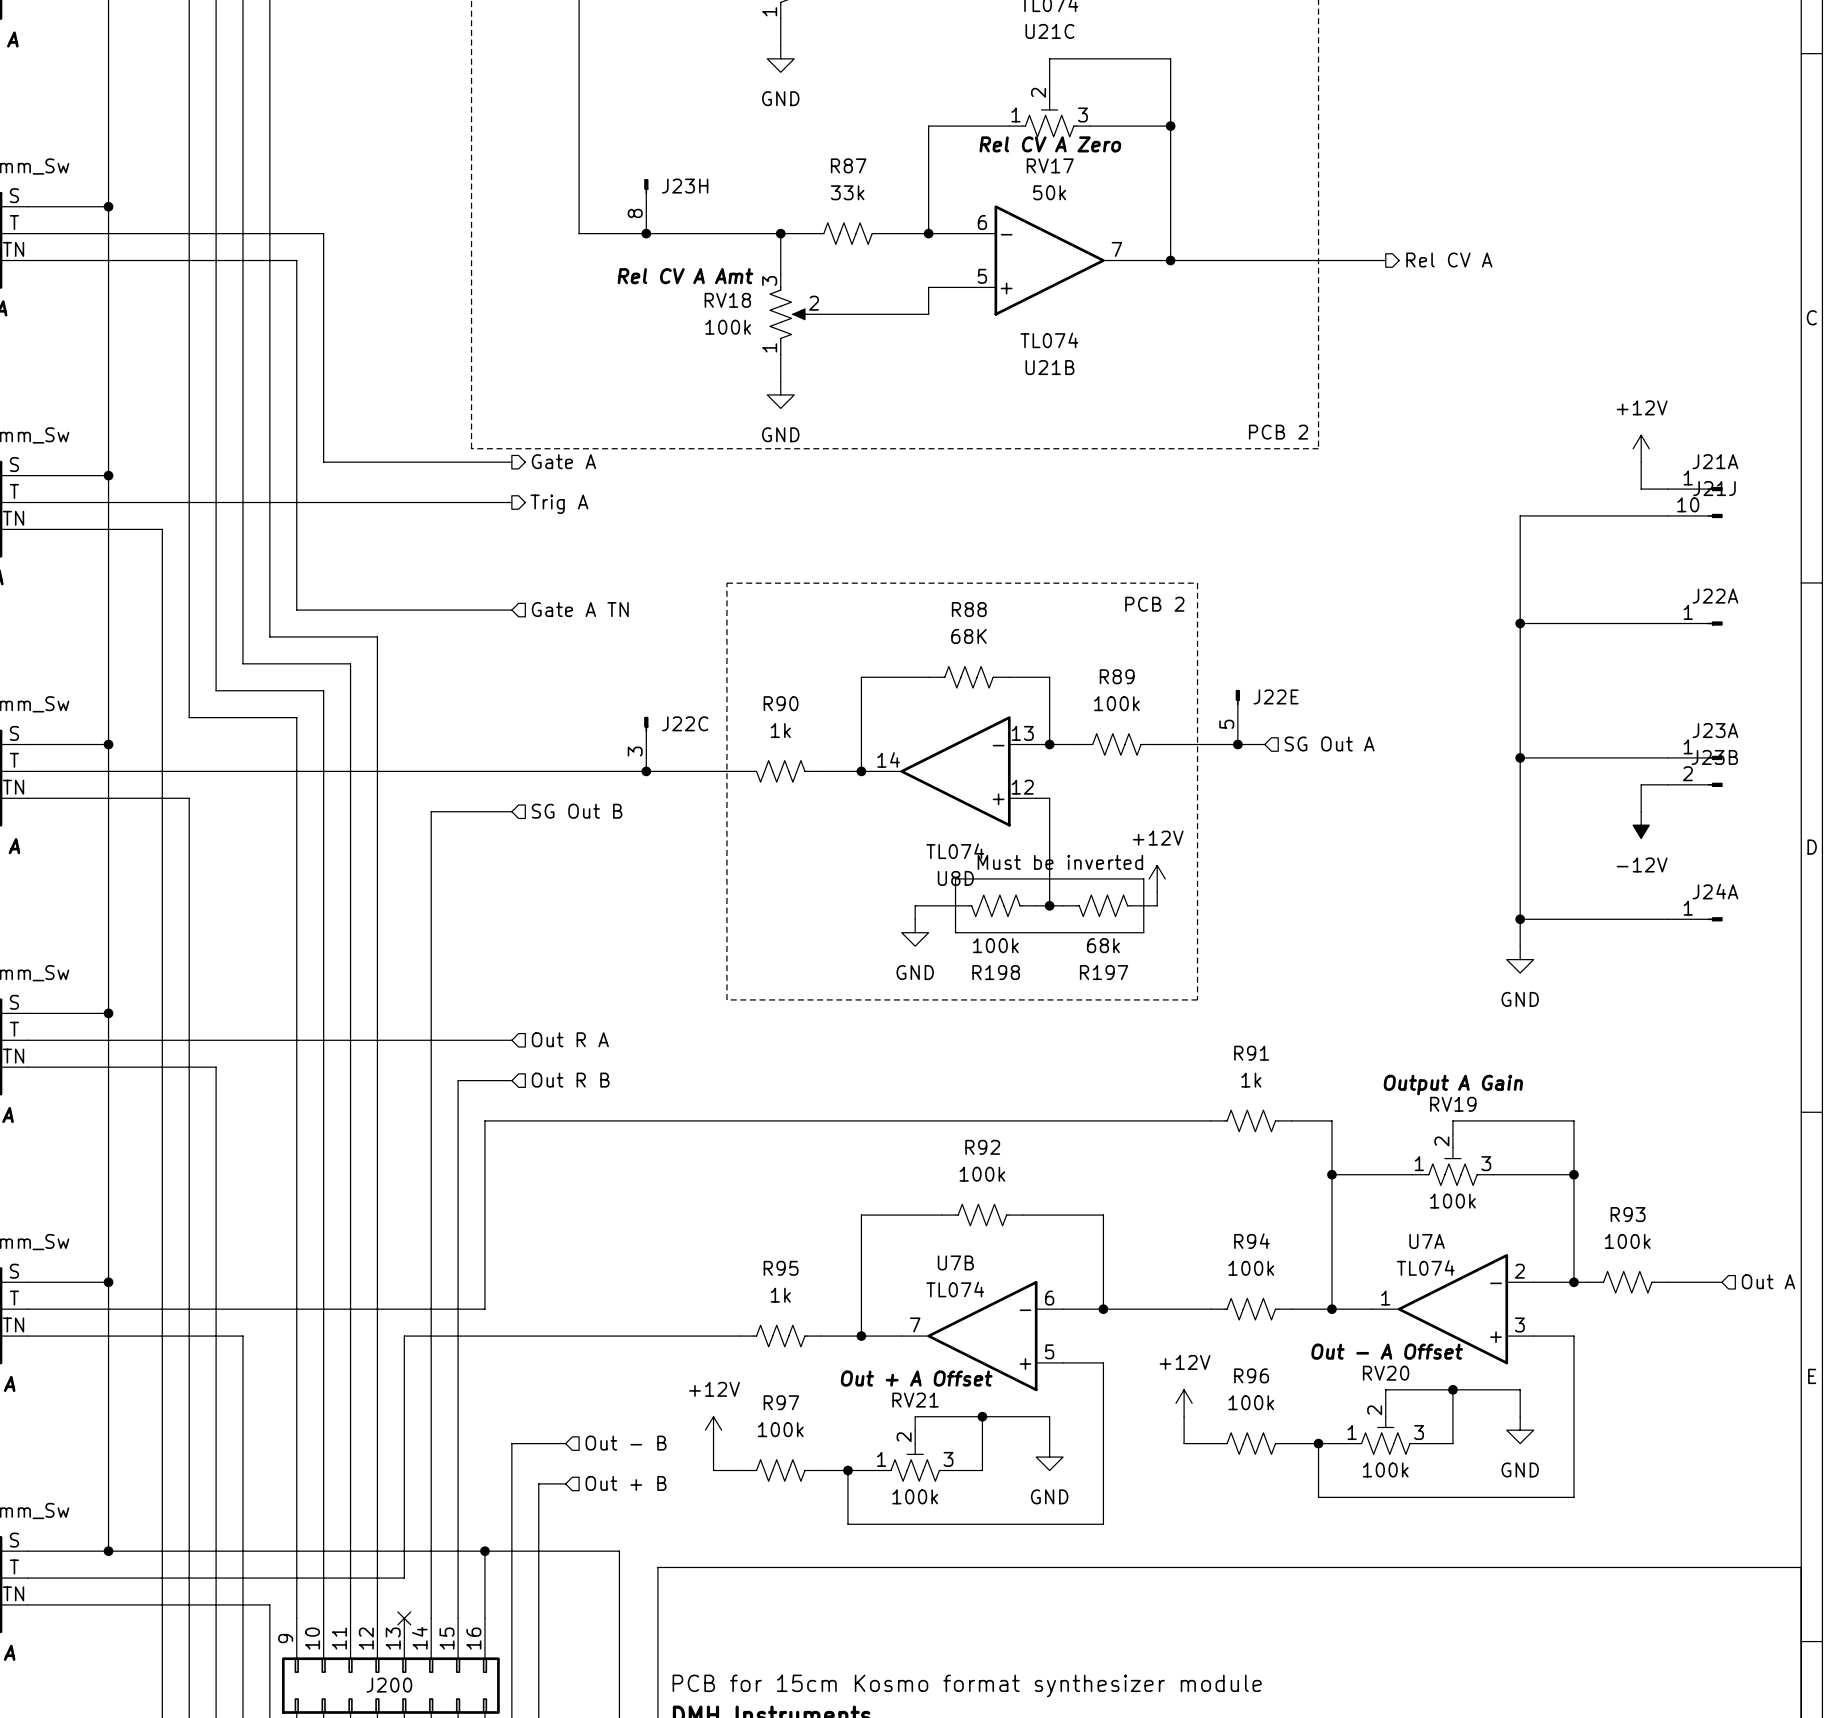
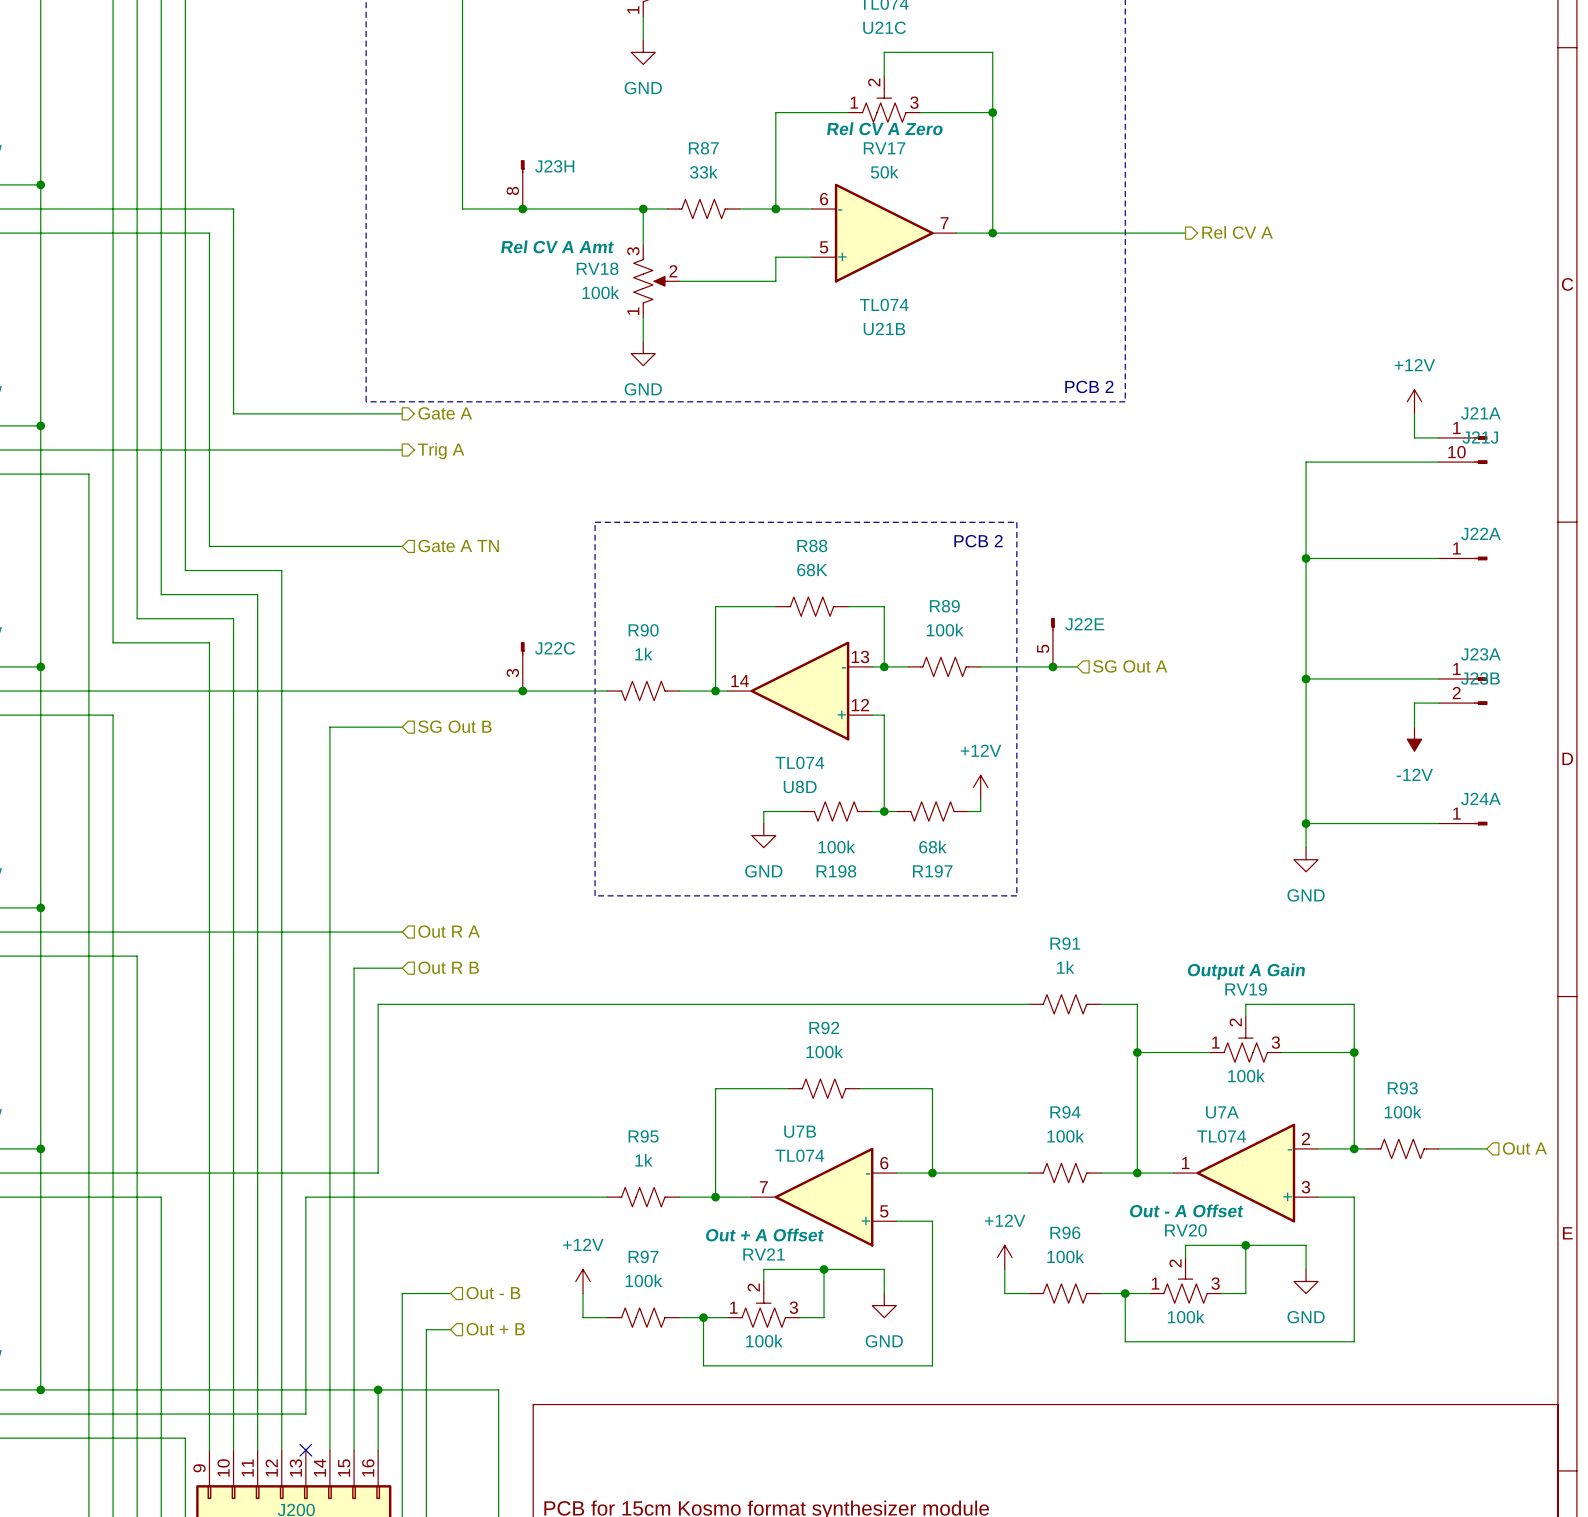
text: Must be inverted (1060, 862) -> none
line: (955, 878) (1143, 878) (1143, 932) (955, 932) (955, 878) -> none

